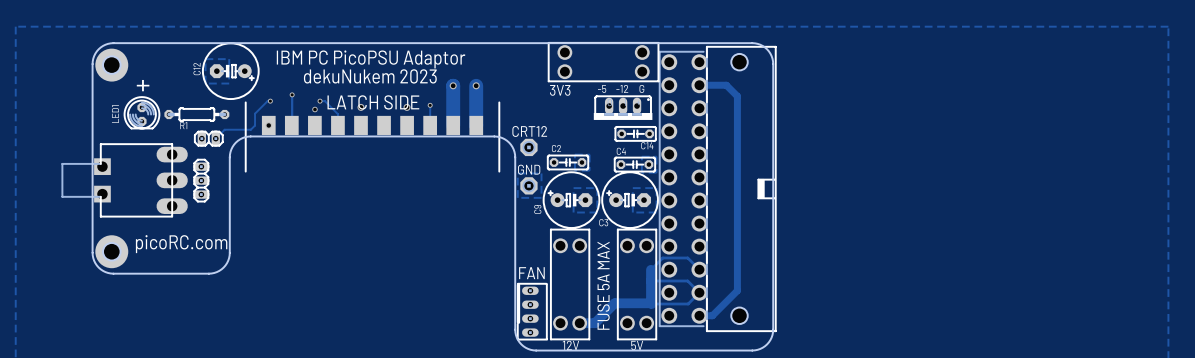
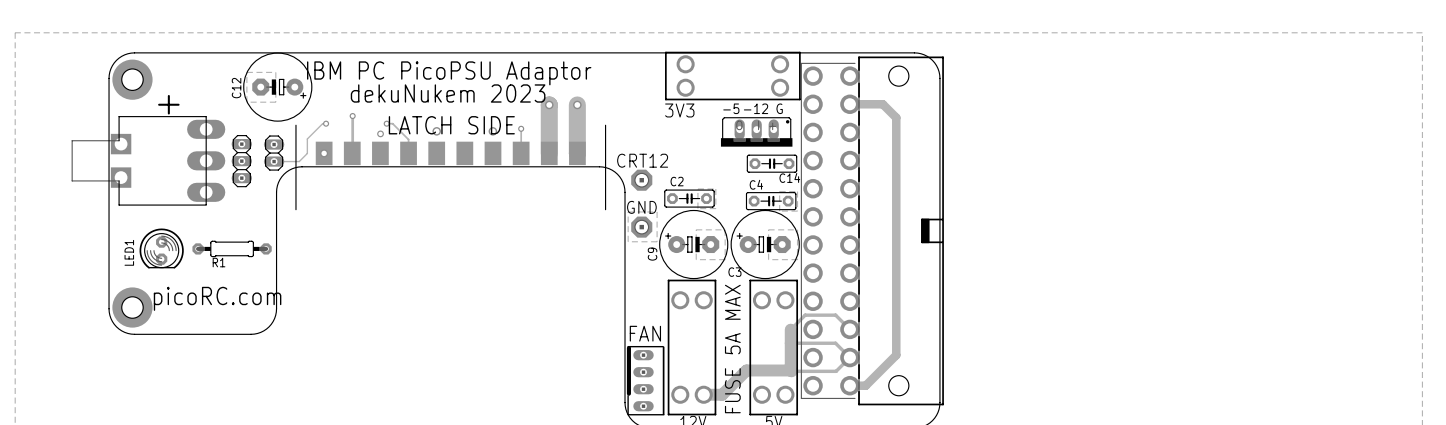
LED1 position: (141, 112) -> (161, 248)
R1 position: (196, 114) -> (232, 248)
track: (250, 129) (224, 129) (215, 138) -> (302, 158) (299, 161) (274, 161)
part rotation: 0° (208, 138) -> 90° clockwise (274, 153)
part position: (208, 138) -> (274, 153)
part position: (124, 180) -> (148, 160)
part position: (201, 180) -> (241, 161)

